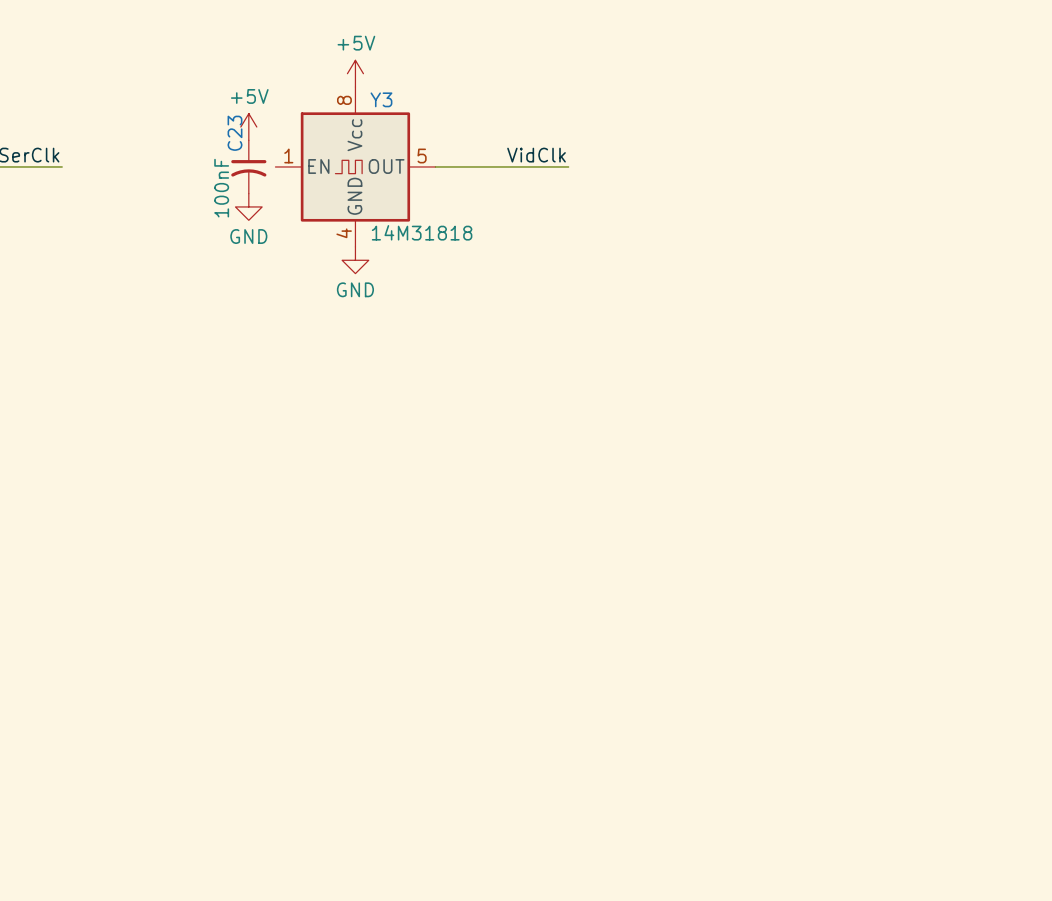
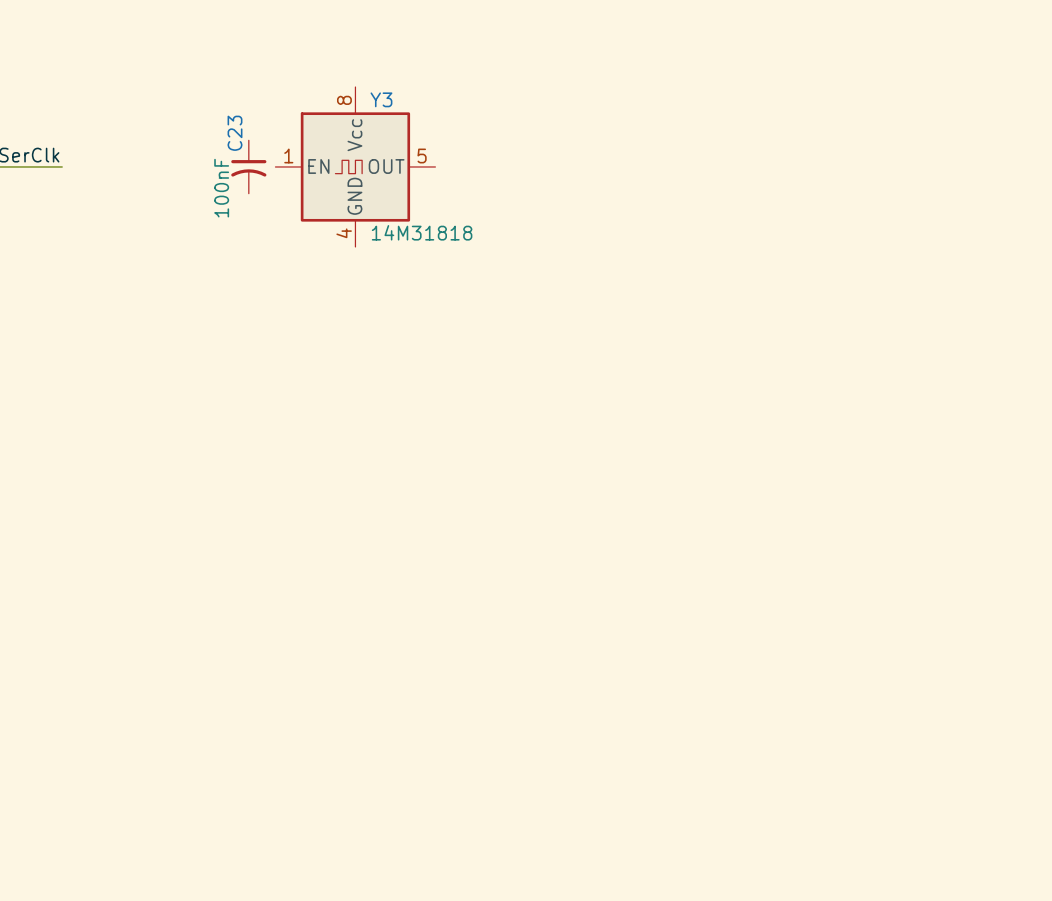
power symbol: +5V (355, 73) -> none
power symbol: +5V (248, 127) -> none
label: VidClk (536, 155) -> none
wire: (435, 166) (568, 166) -> none
power symbol: GND (248, 206) -> none
power symbol: GND (355, 260) -> none

